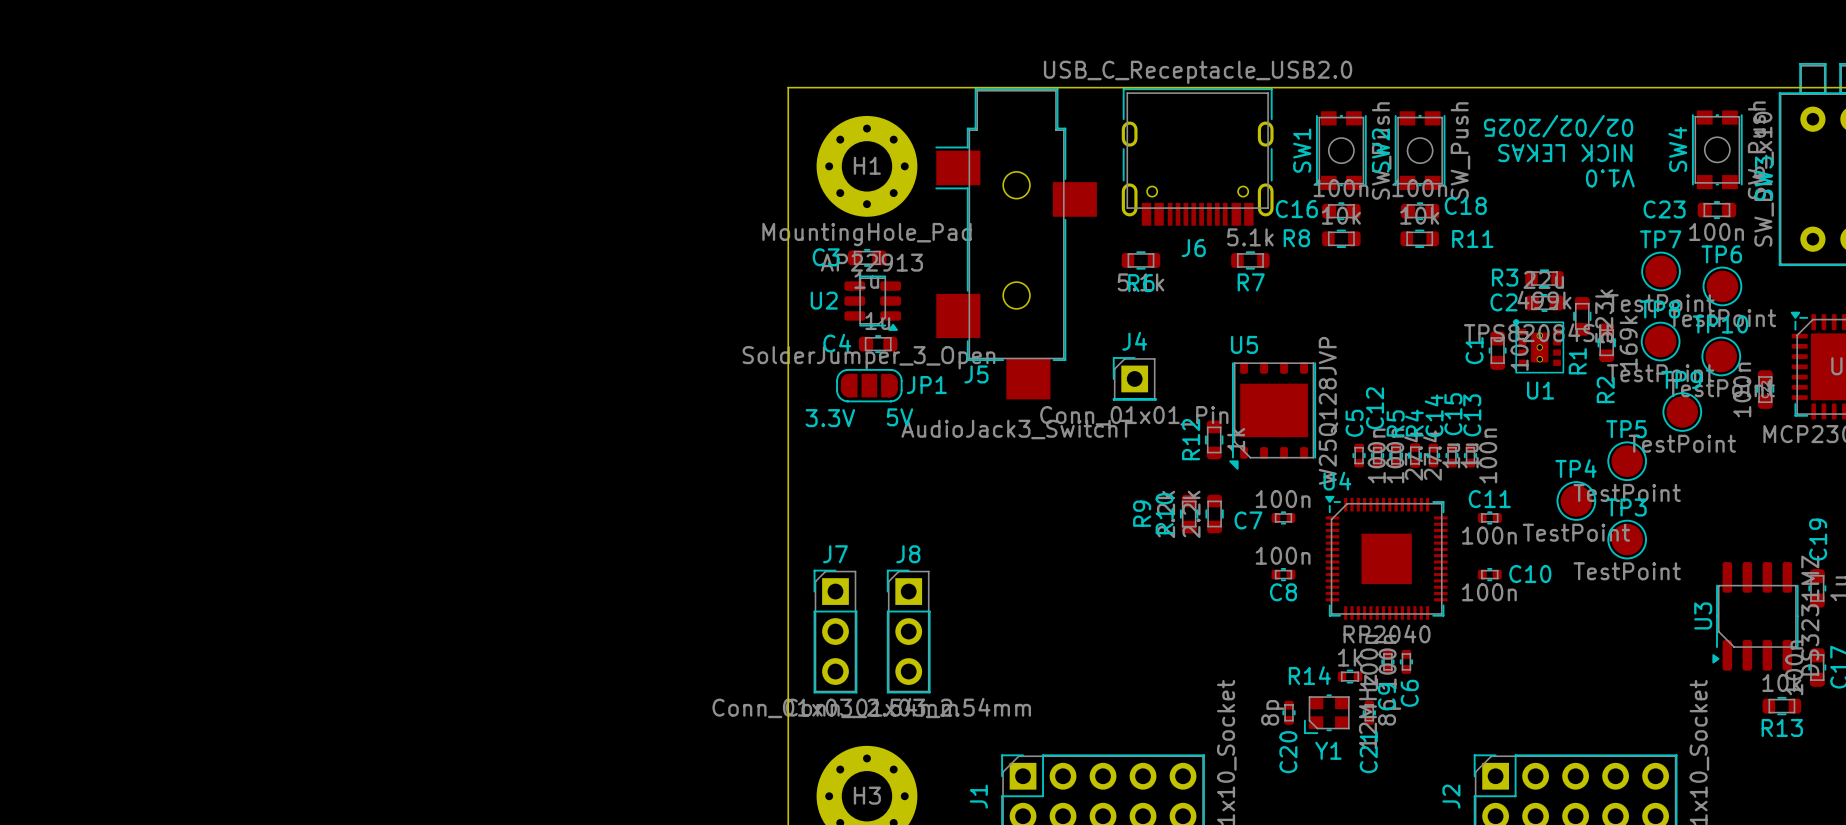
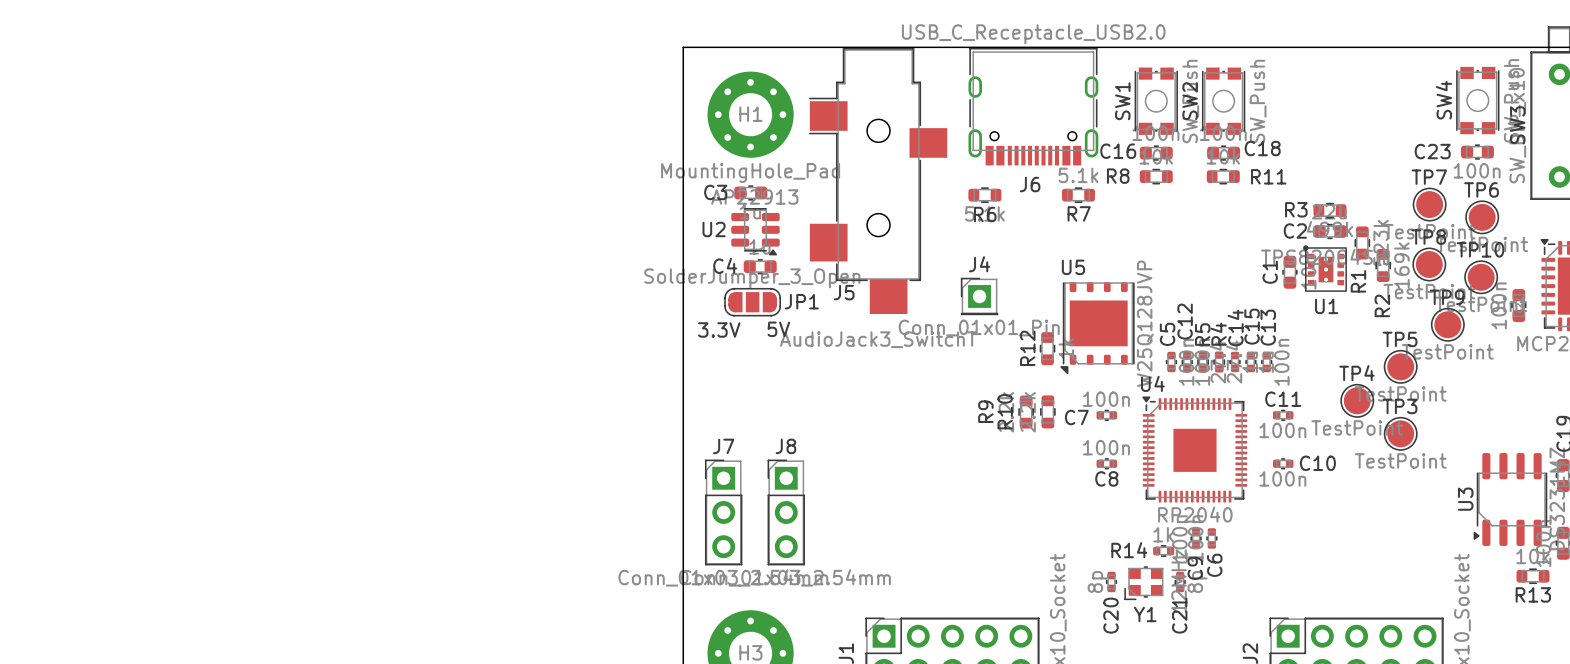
text: 02/02/2025 (1558, 126) -> none
text: NICK LEKAS (1565, 153) -> none
text: V1.0 (1610, 178) -> none

